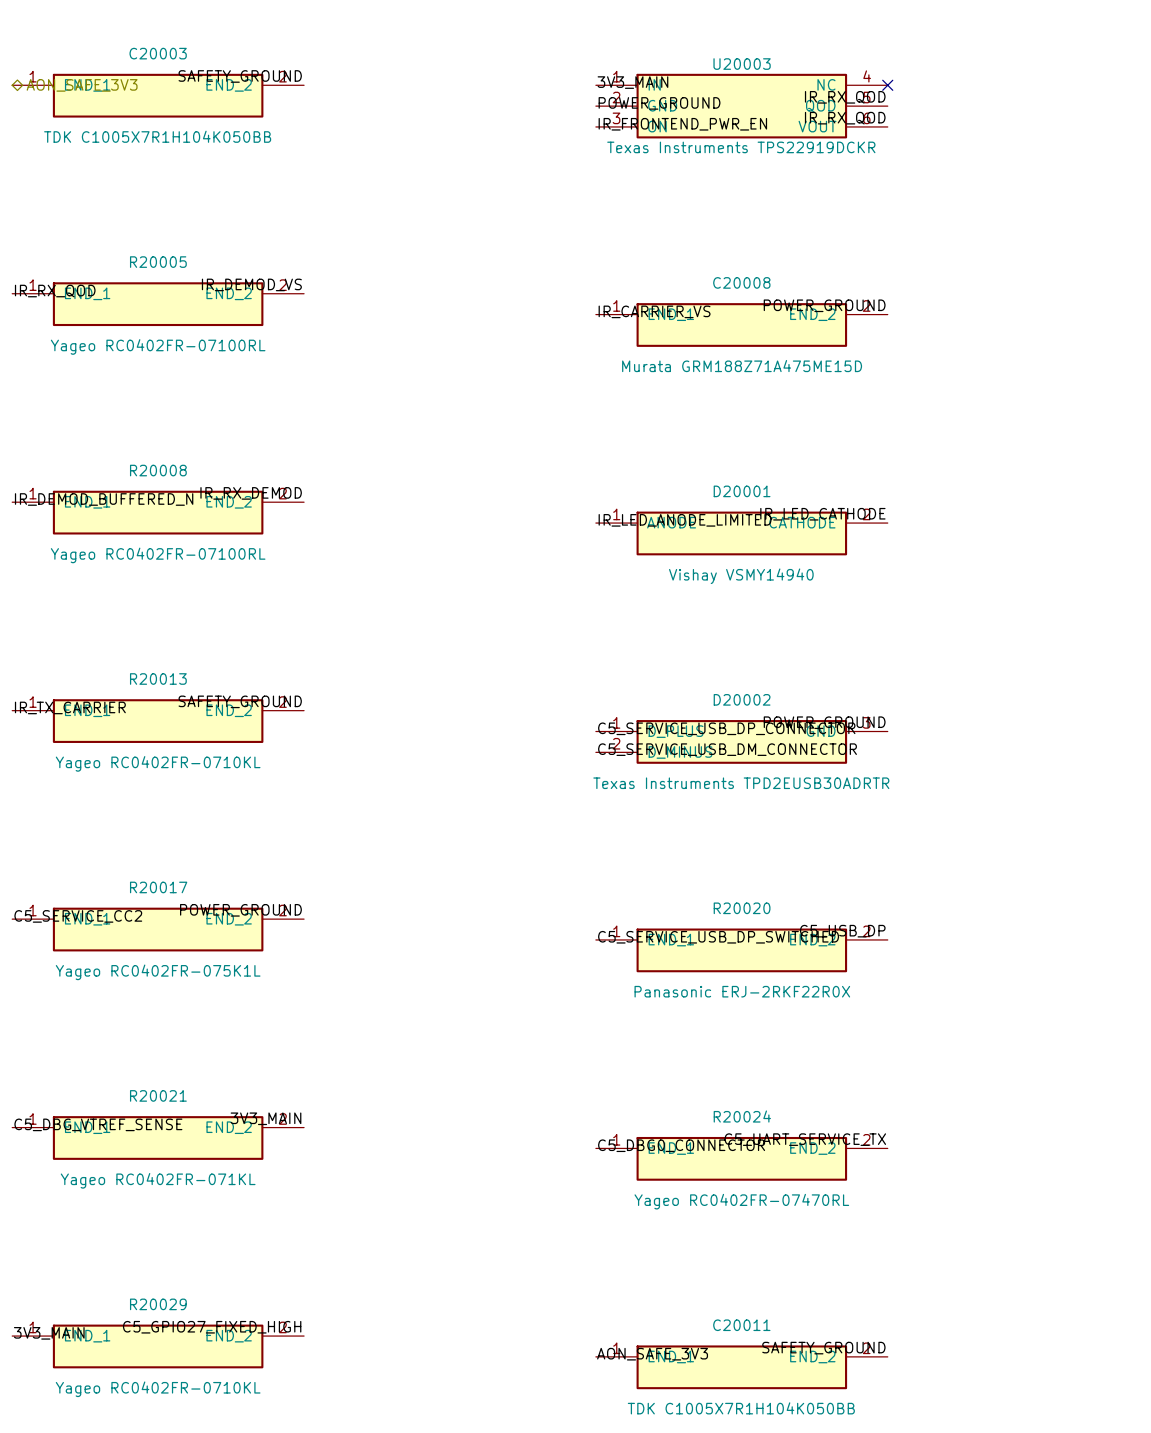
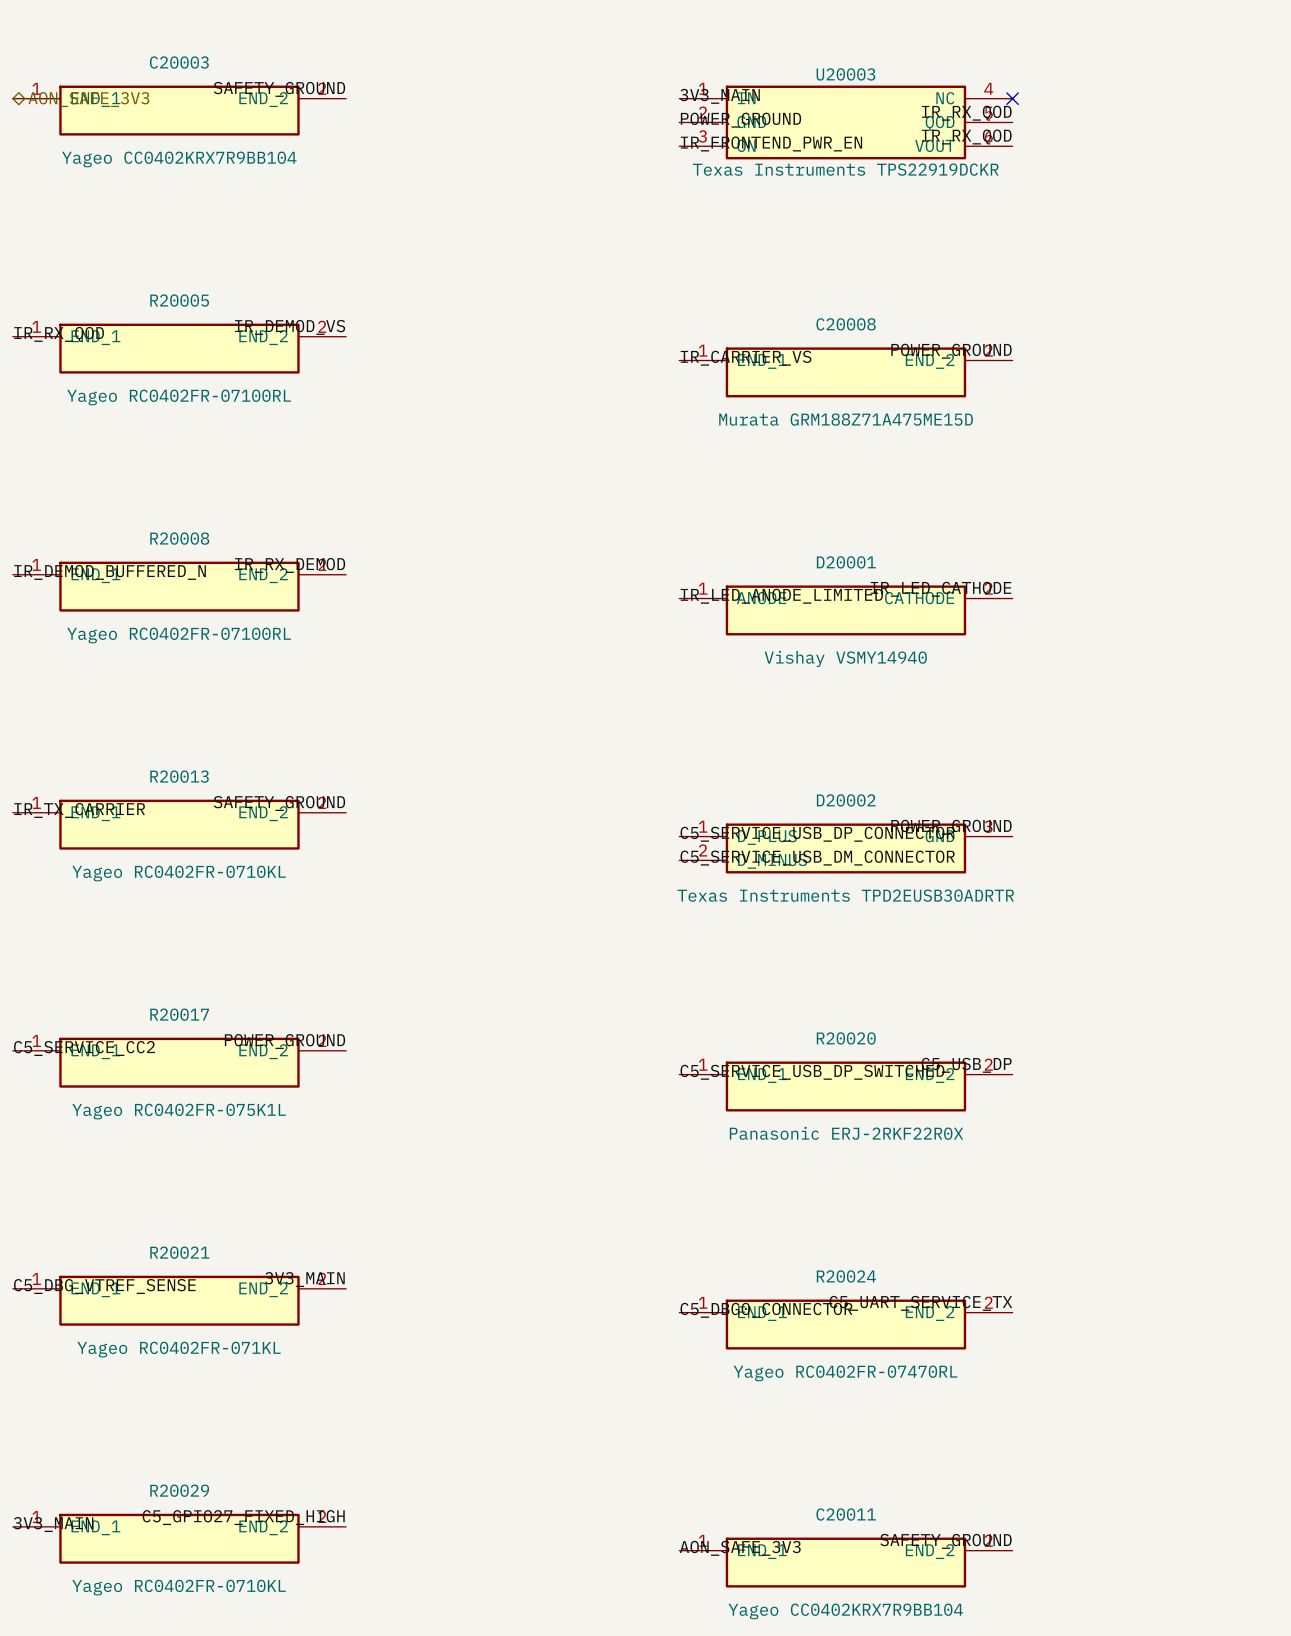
C20003 value: TDK C1005X7R1H104K050BB (157, 136) -> Yageo CC0402KRX7R9BB104 (179, 159)
C20011 value: TDK C1005X7R1H104K050BB (741, 1408) -> Yageo CC0402KRX7R9BB104 (845, 1611)

